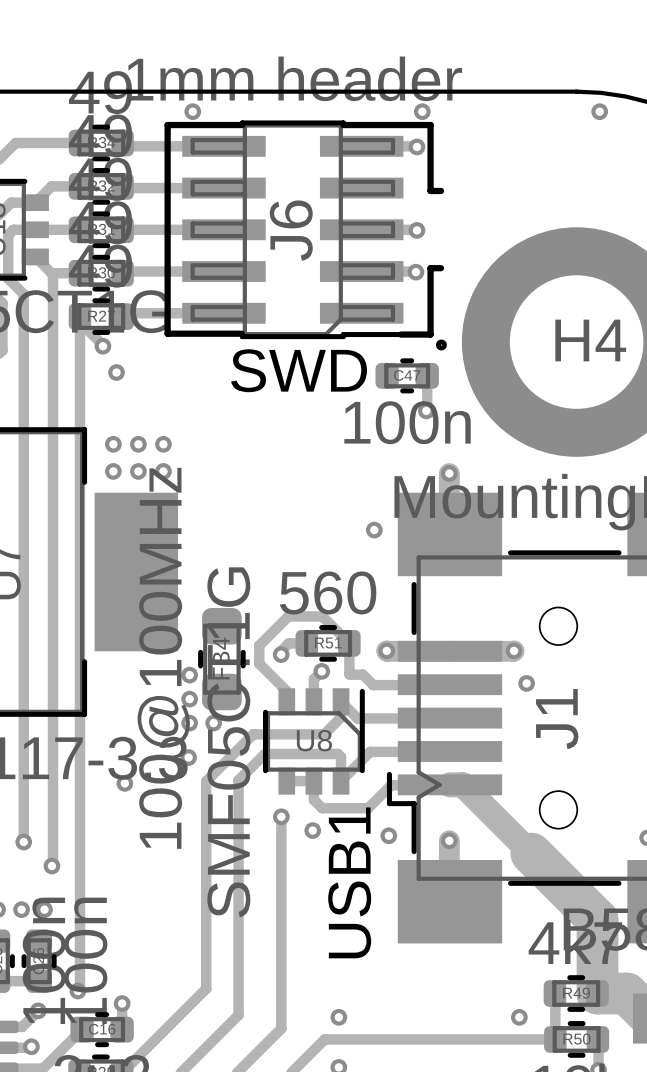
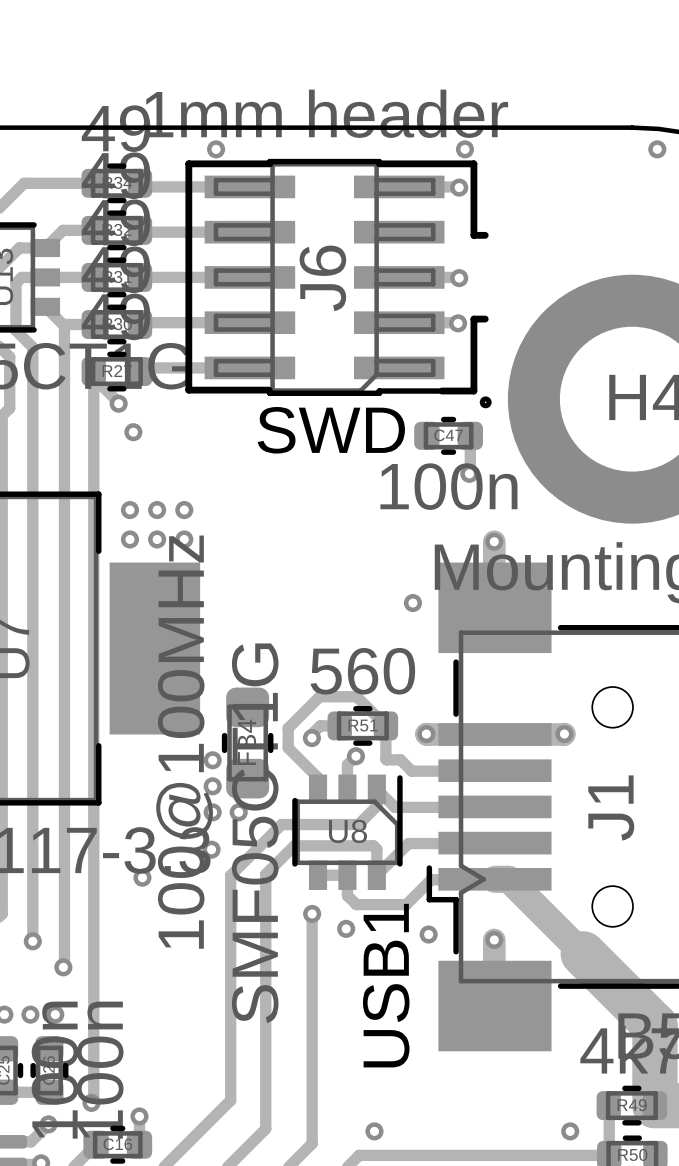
via: (526, 683) -> none

